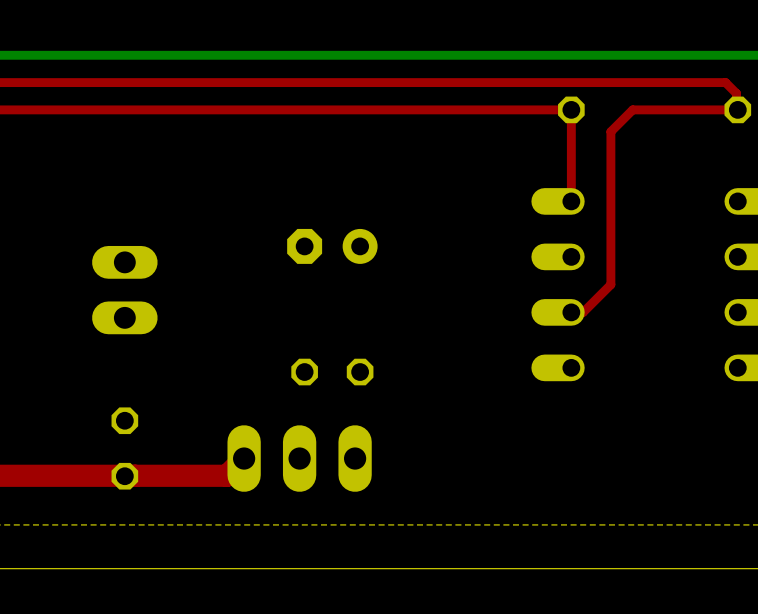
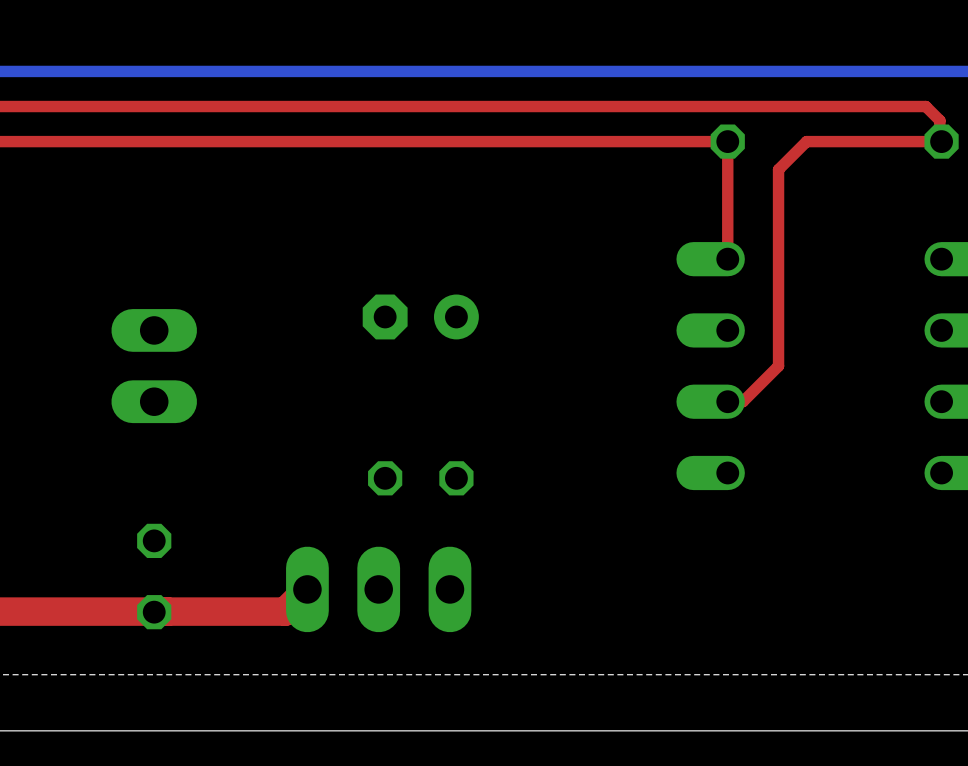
part footprint: [92, 245, 158, 335] -> [111, 309, 197, 424]

